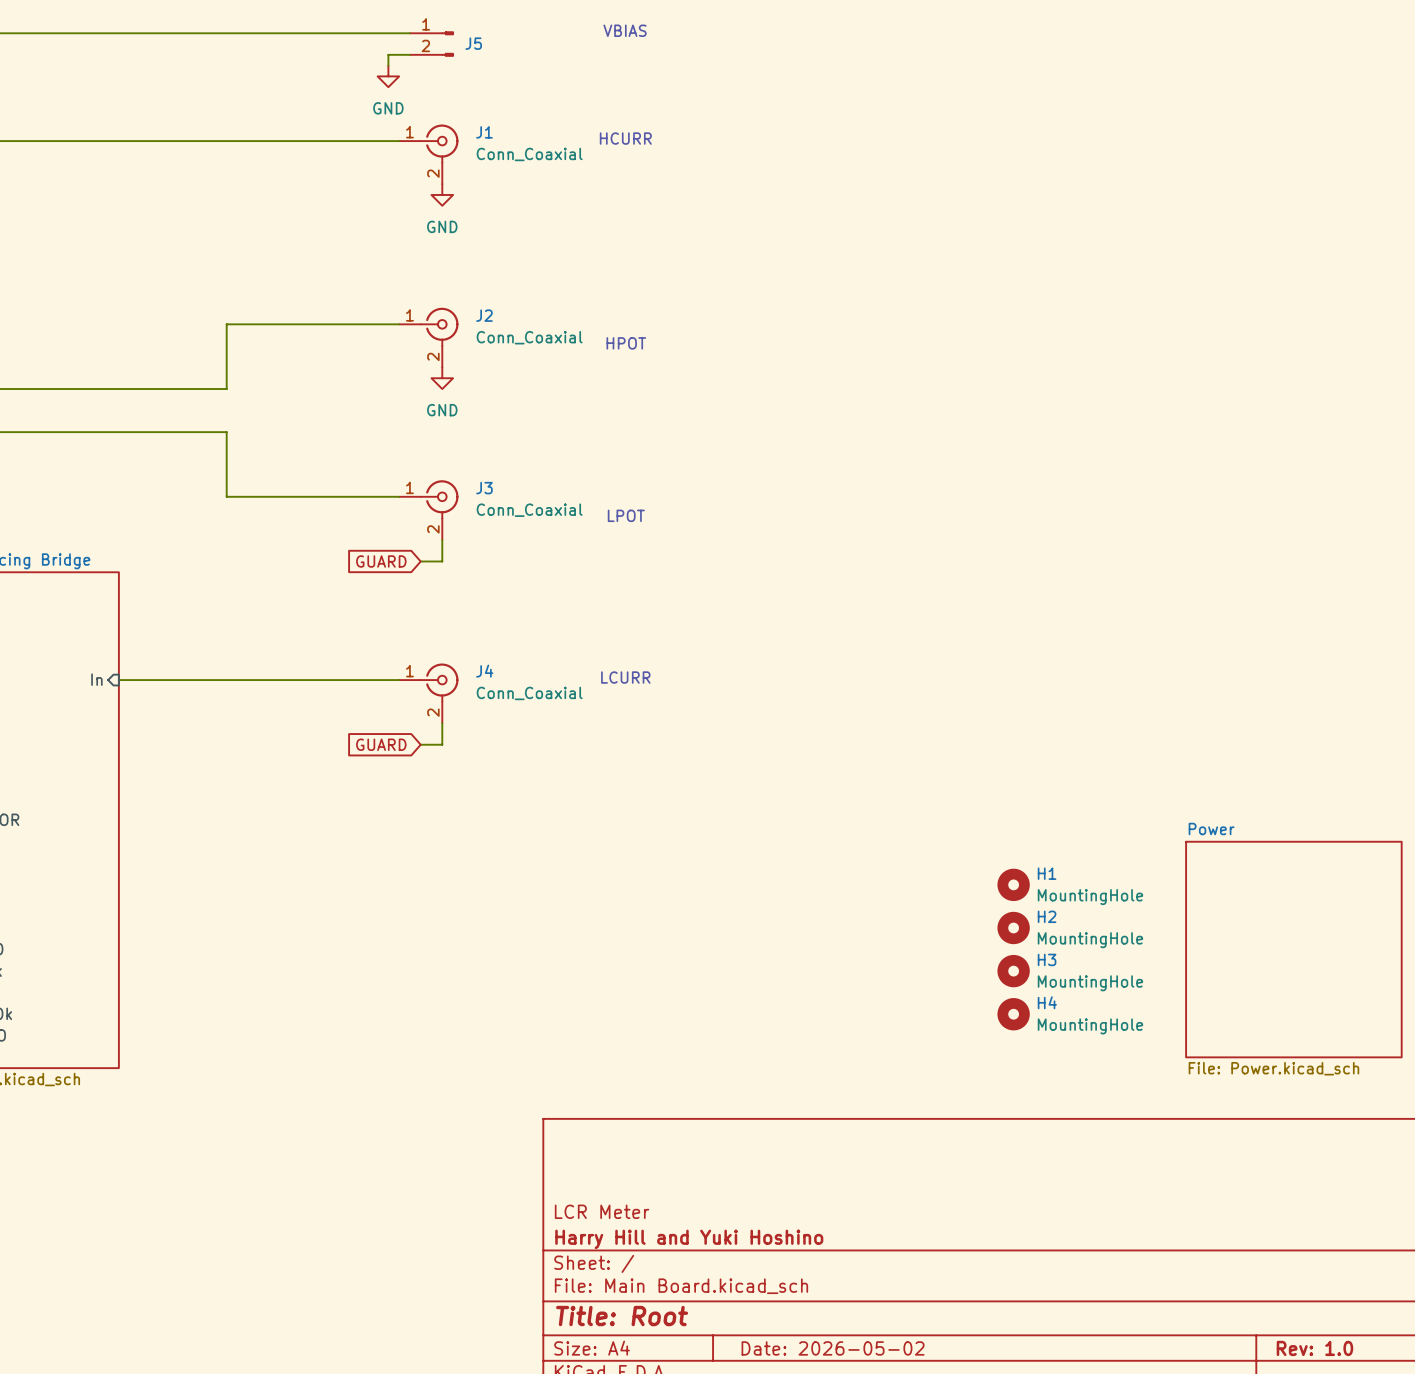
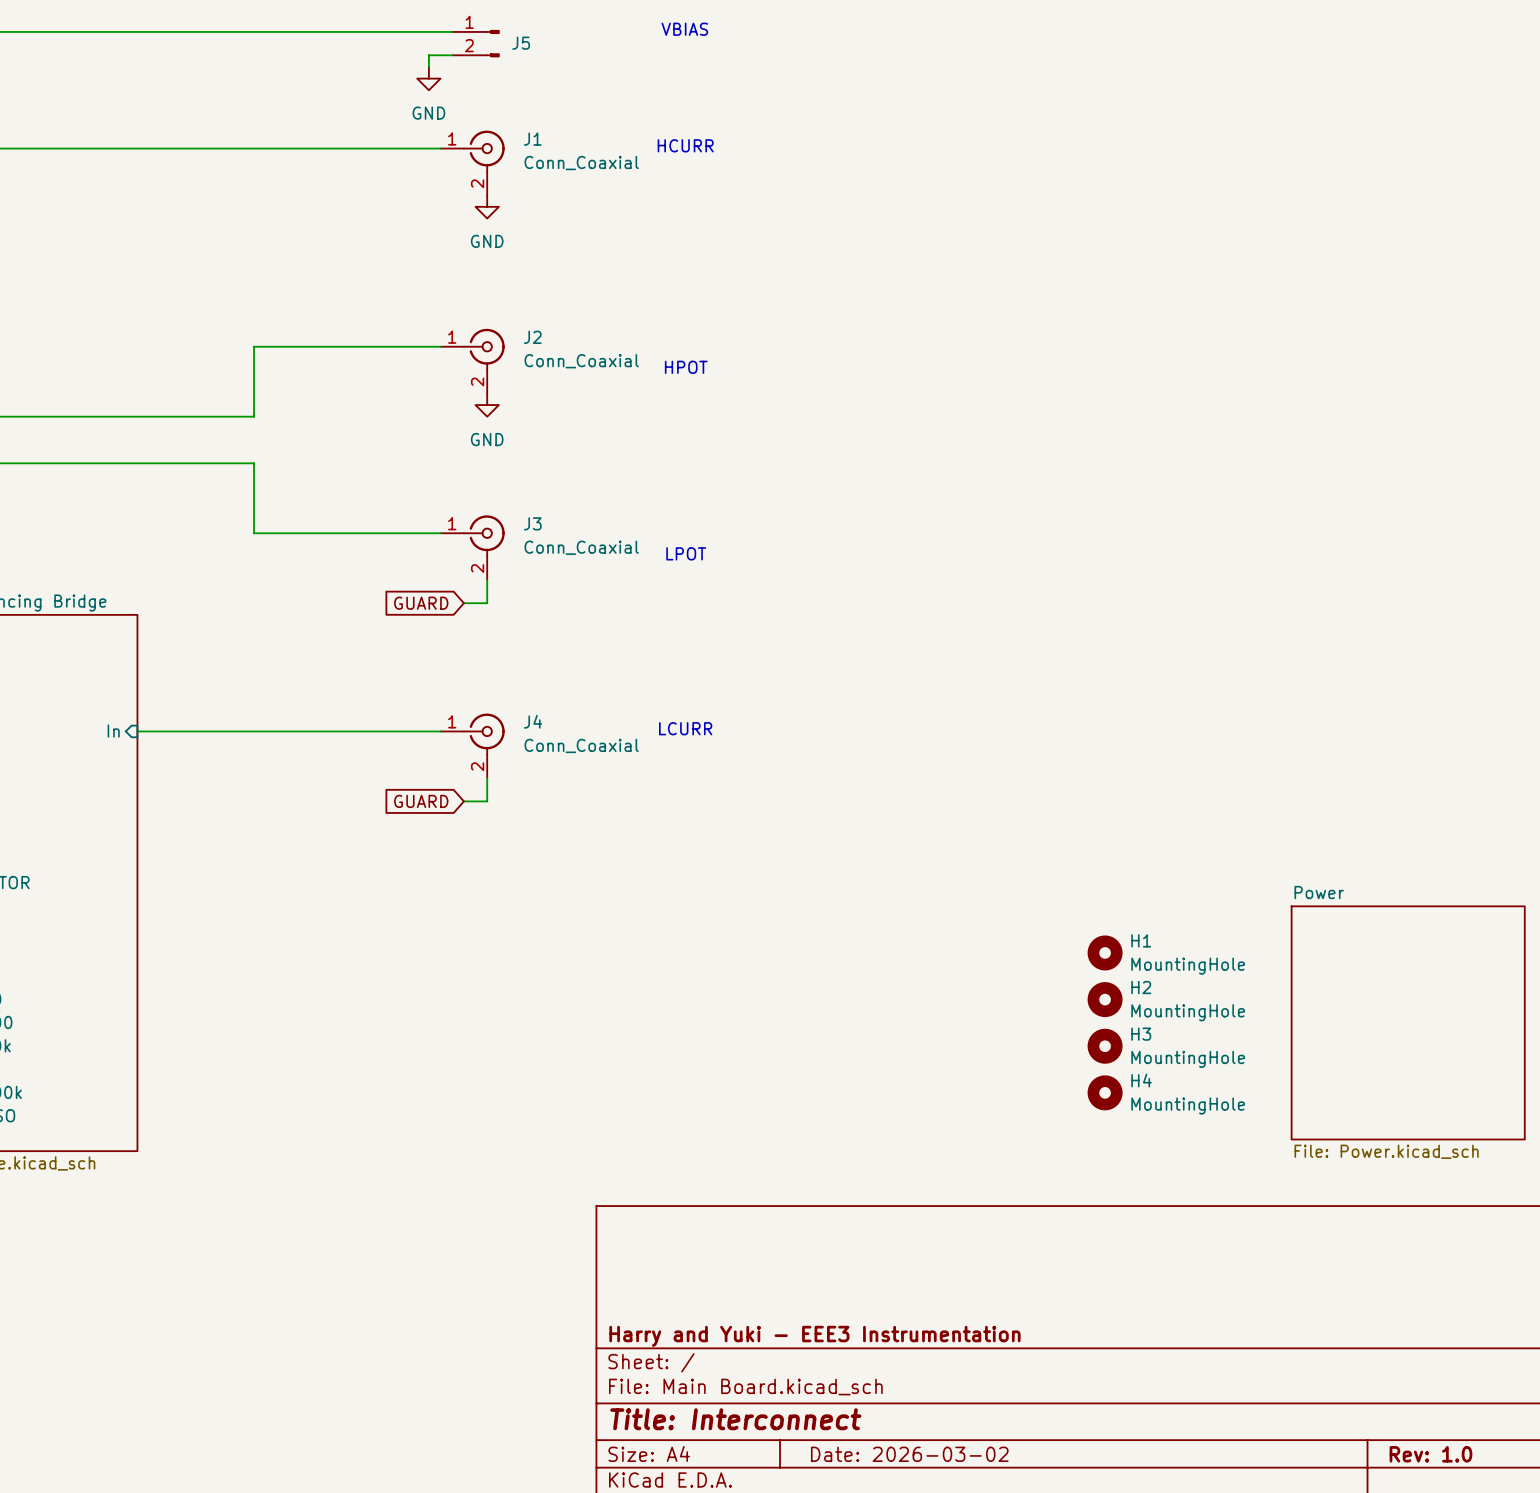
title block: LCR Meter (602, 1211) -> none
title block: Harry Hill and Yuki Hoshino (689, 1239) -> Harry and Yuki - EEE3 Instrumentation (814, 1336)
title block: Title: Root (622, 1316) -> Title: Interconnect (735, 1419)
title block: Date: 2026-05-02 (833, 1348) -> Date: 2026-03-02 (909, 1454)

